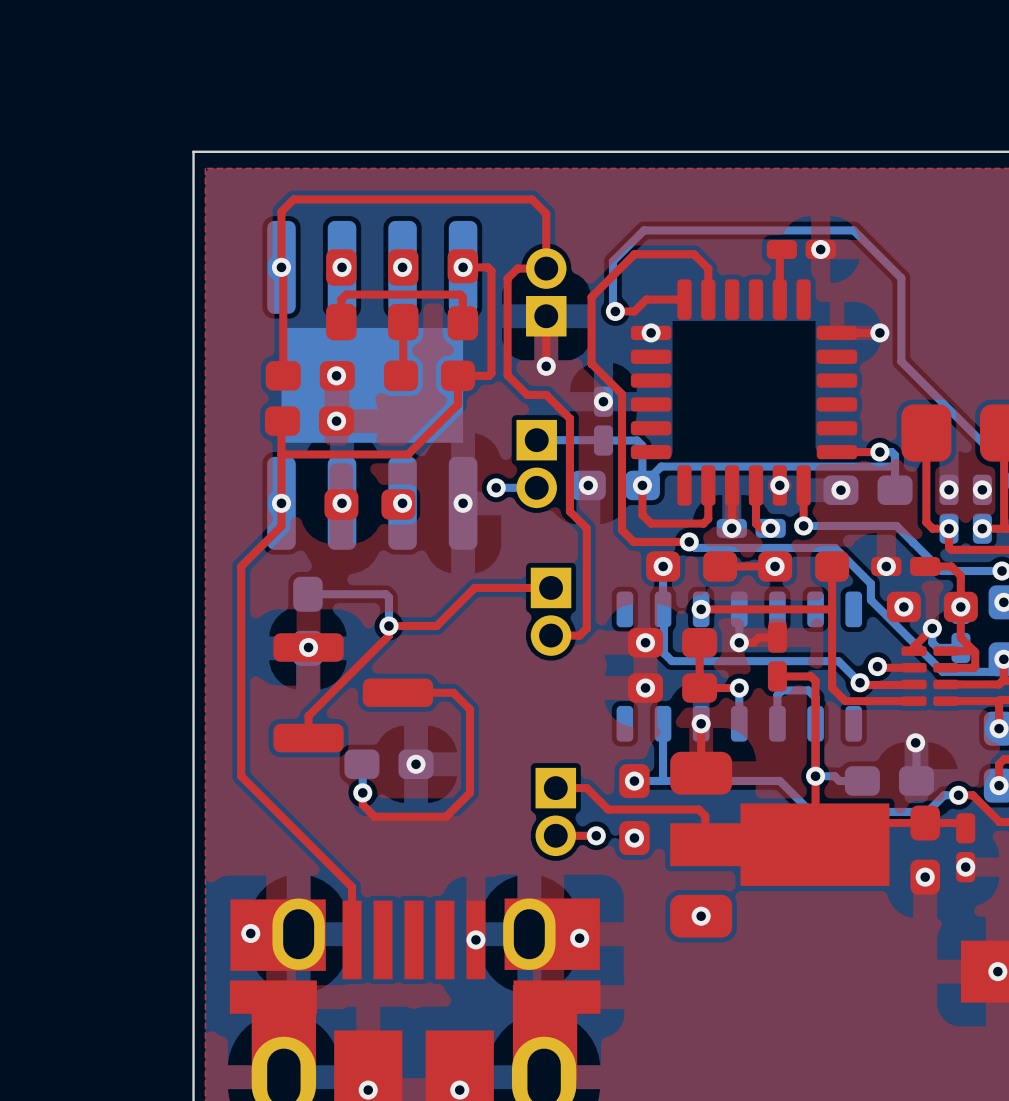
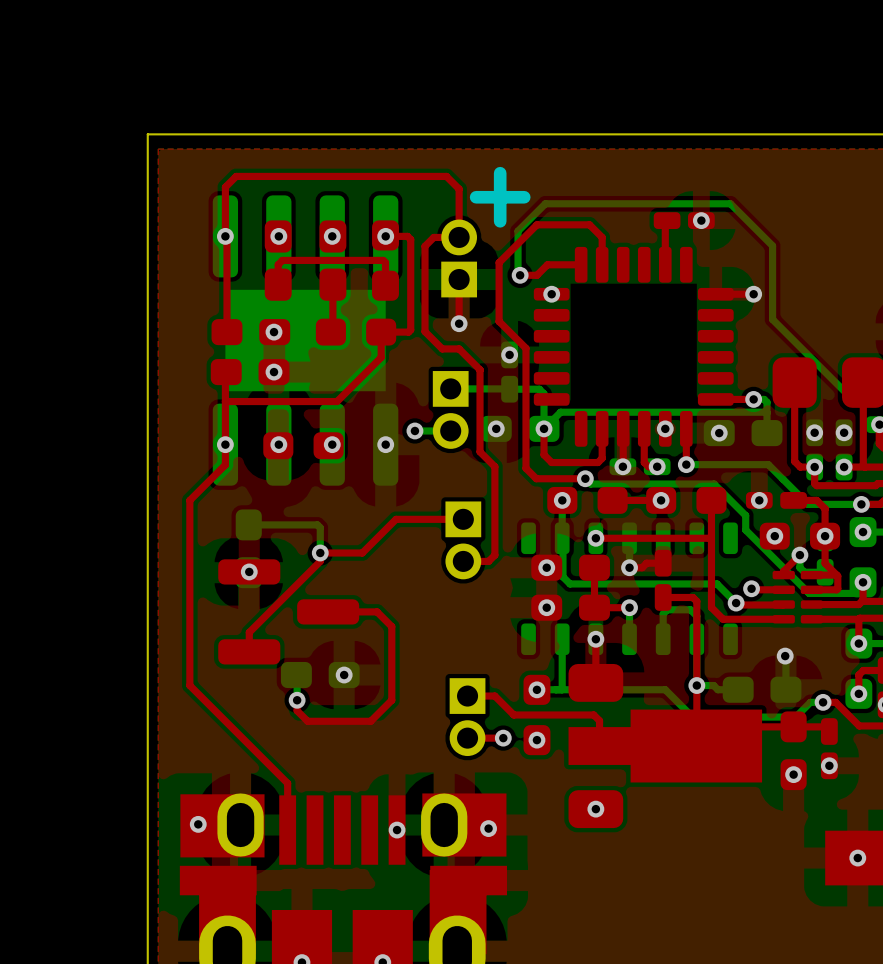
text: none -> + (500, 197)

